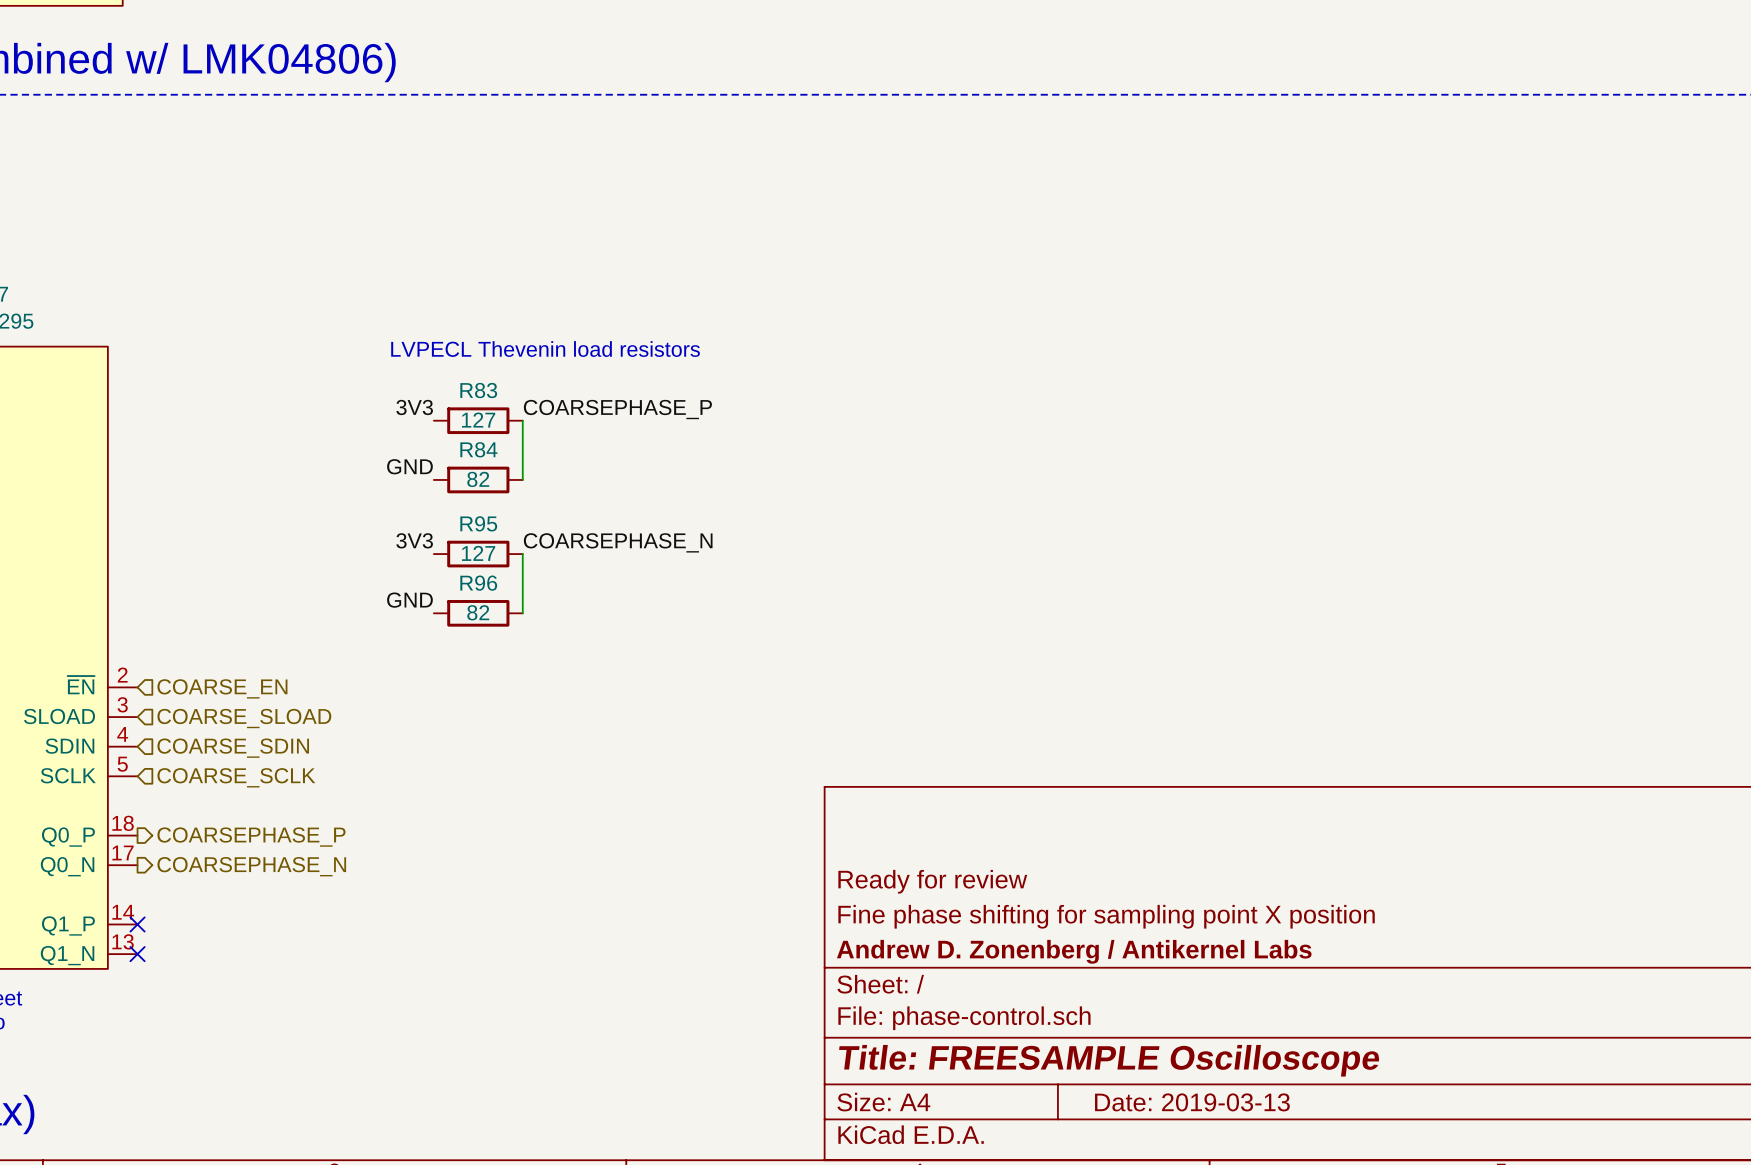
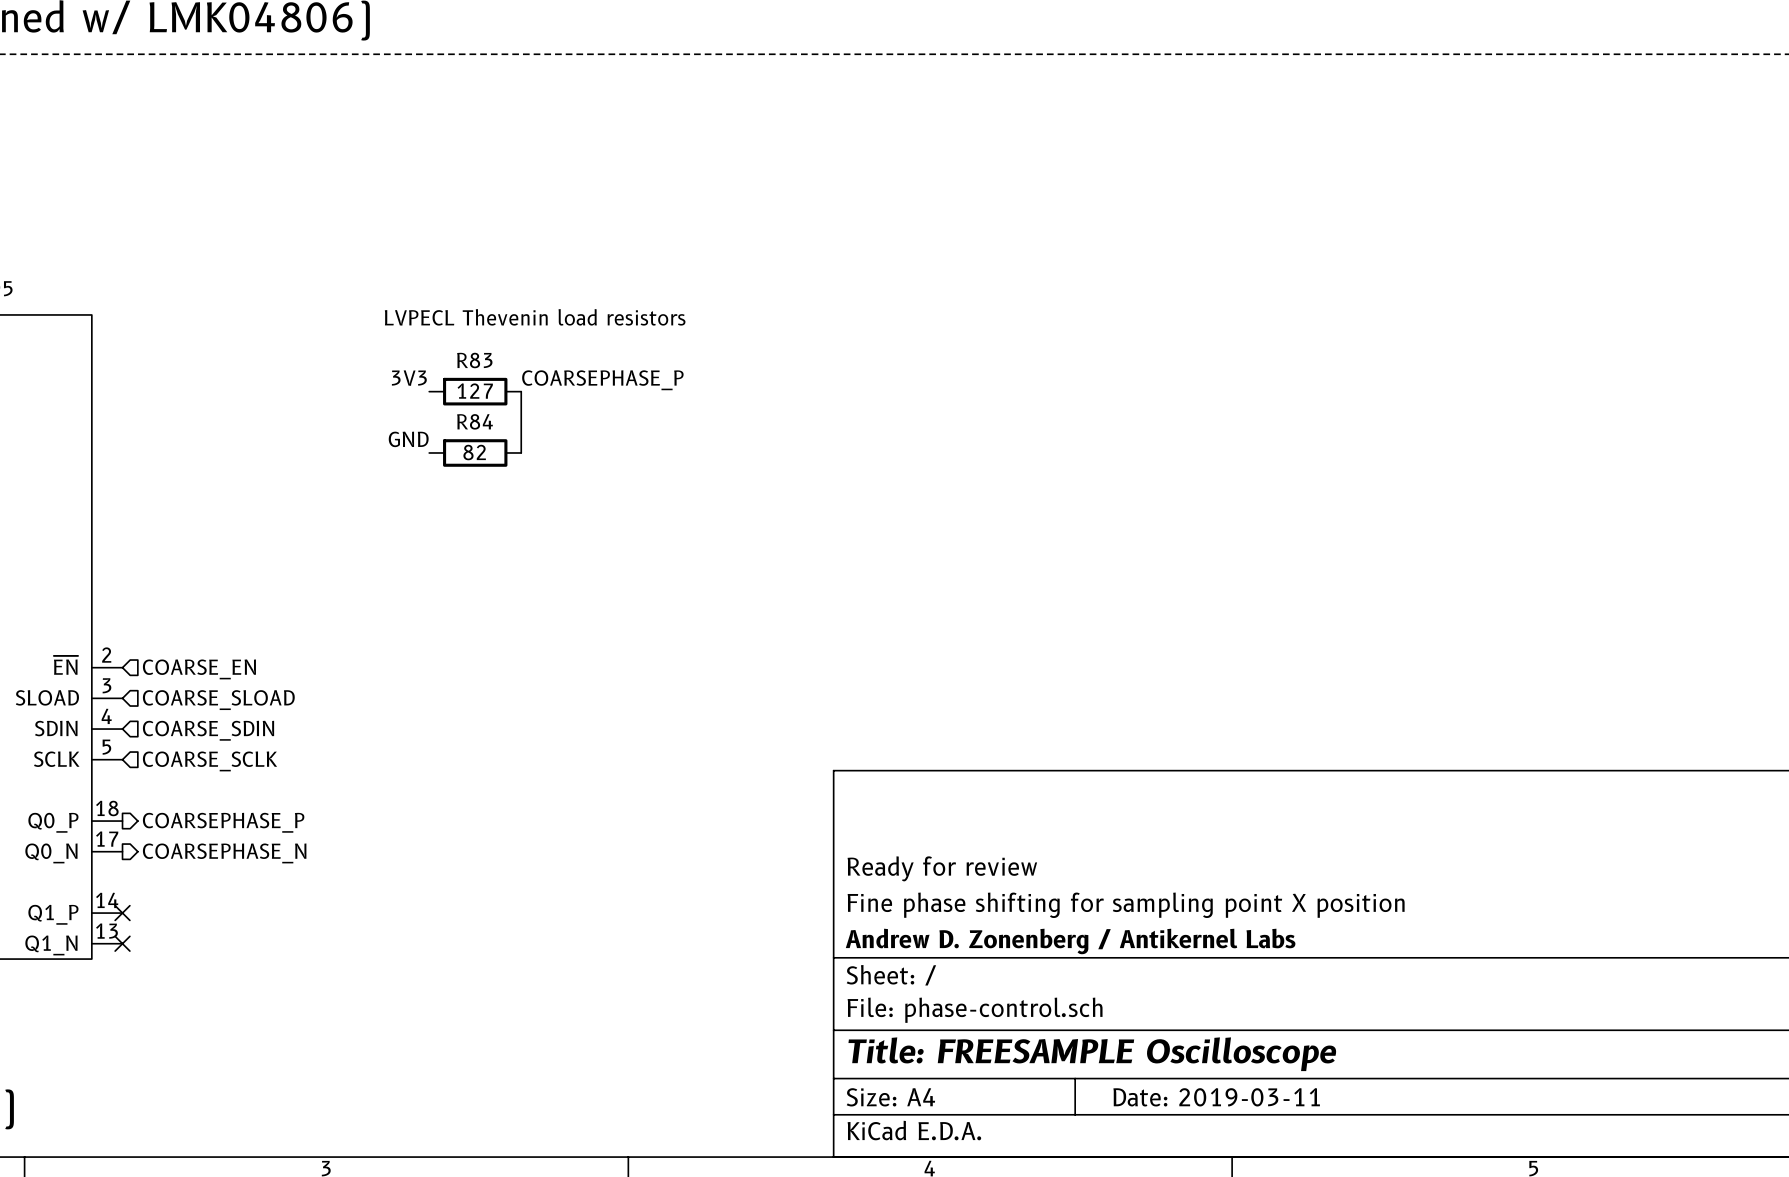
label: 3V3 (414, 540) -> none
label: COARSEPHASE_N (618, 542) -> none
R95: 127 (478, 554) -> none
wire: (522, 554) (522, 613) -> none
label: GND (409, 600) -> none
R96: 82 (478, 613) -> none
title block: Date: 2019-03-13 (1192, 1102) -> Date: 2019-03-11 (1216, 1097)

